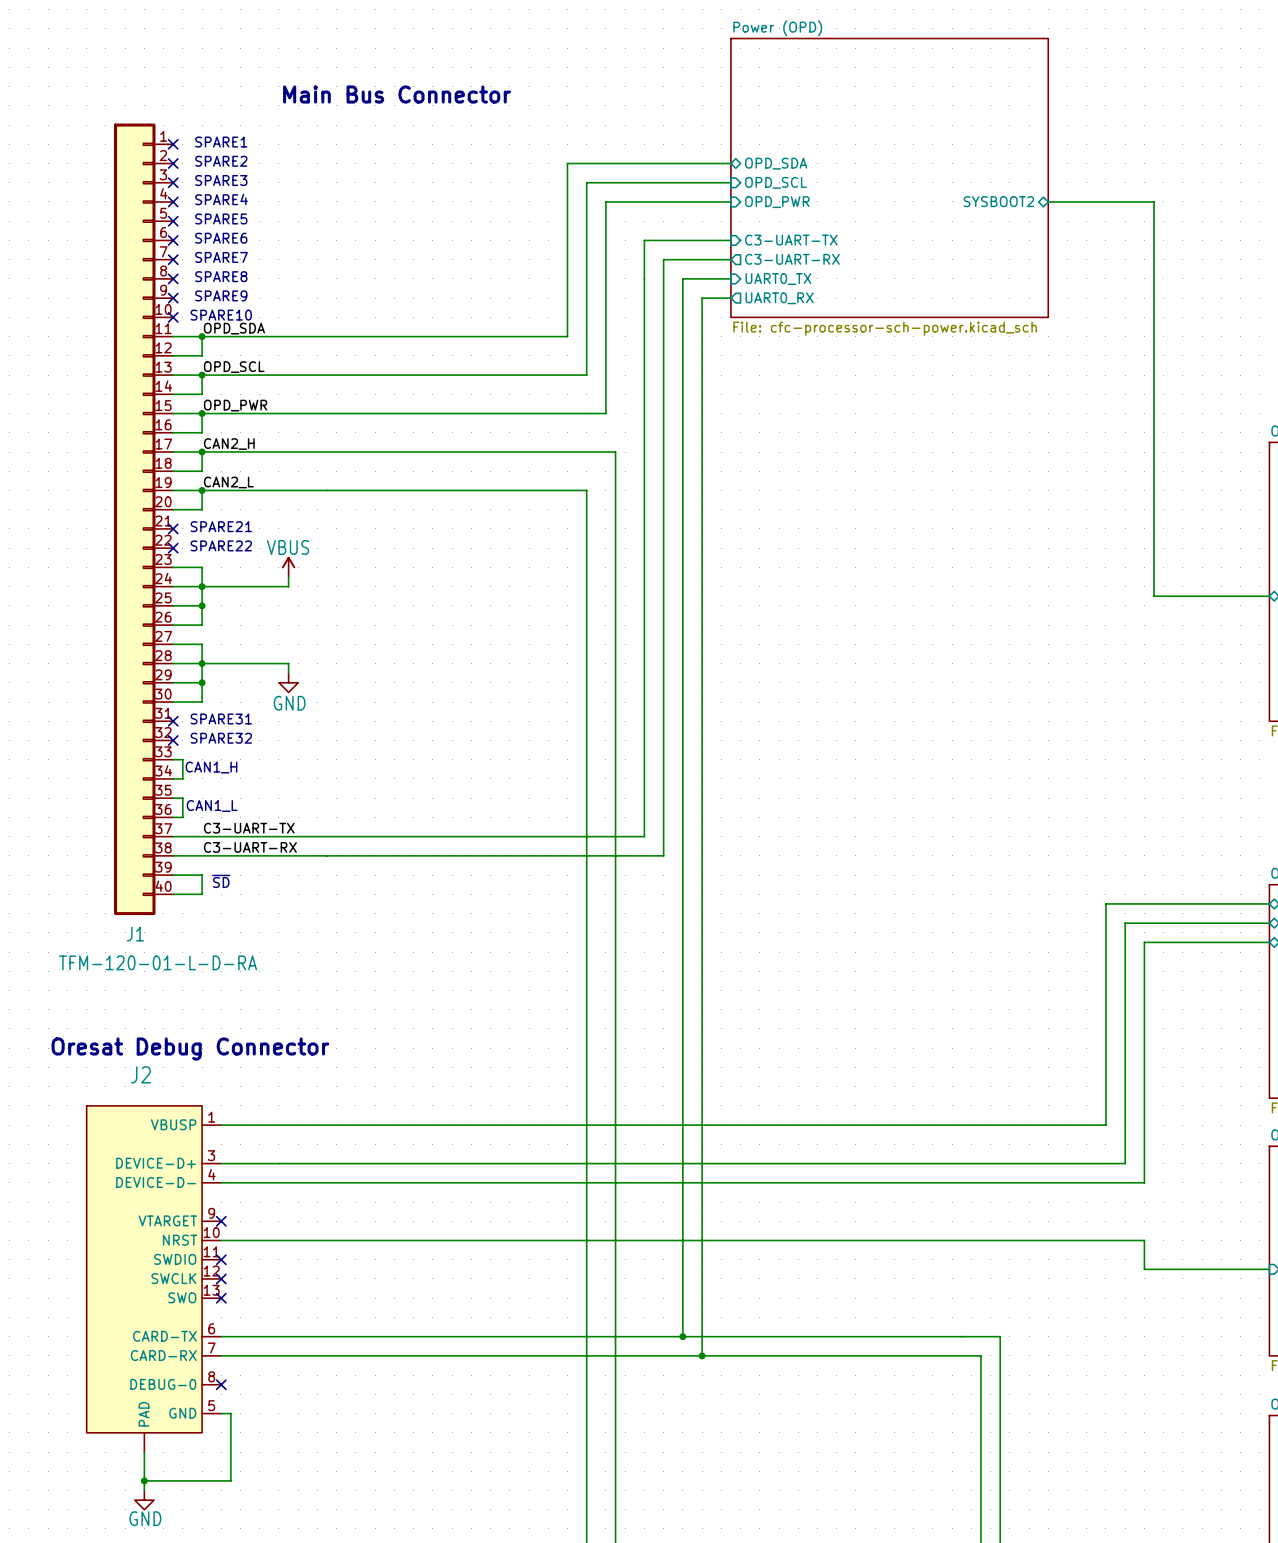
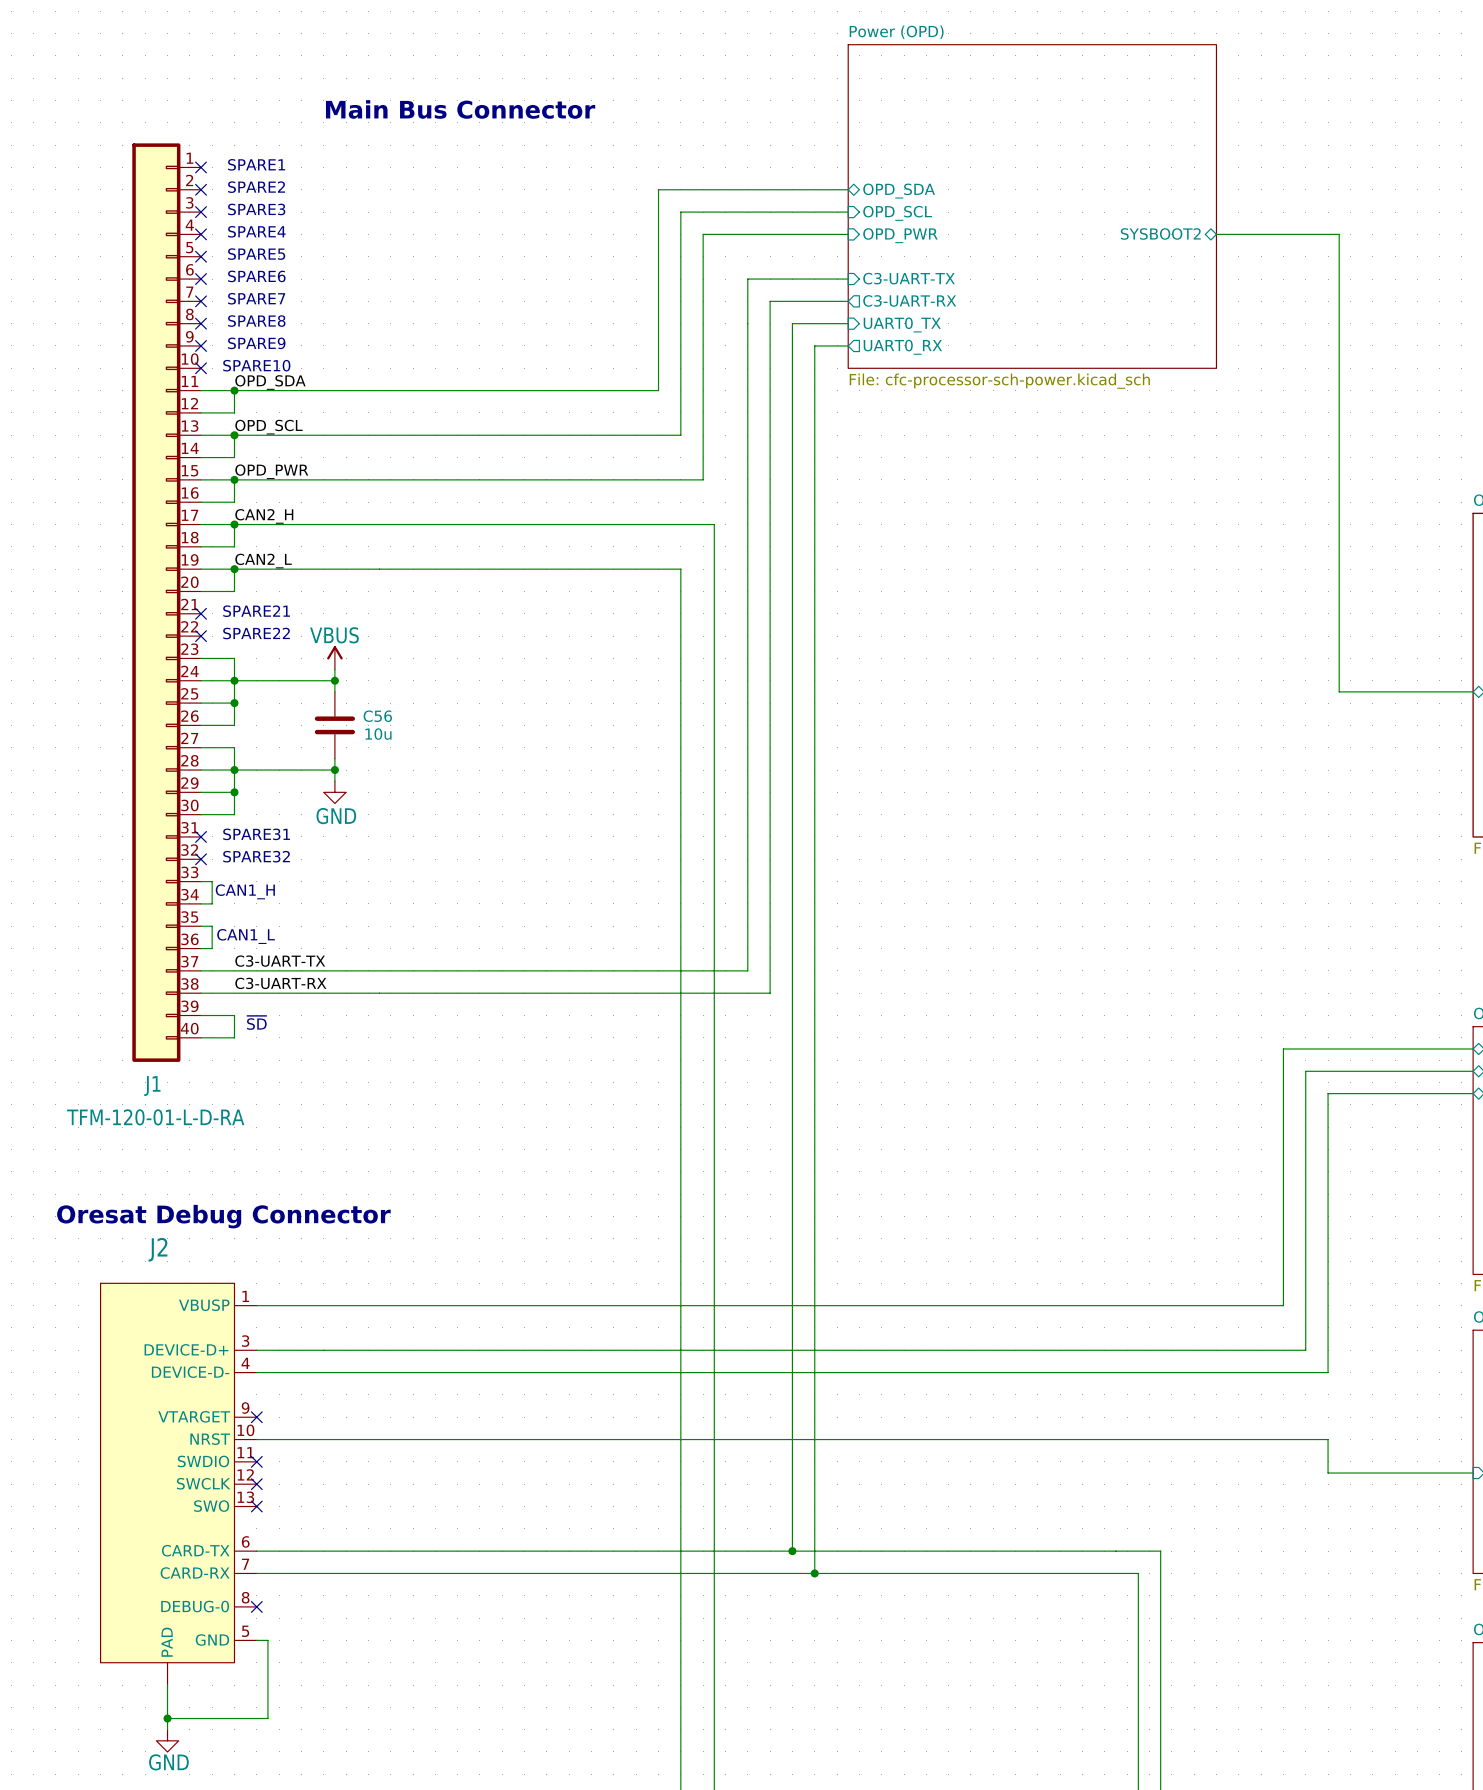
wire: none -> (334, 680) (334, 691)
junction: none -> (334, 680)
C56: none -> 10u (334, 725)
wire: none -> (334, 758) (334, 770)
junction: none -> (334, 770)

